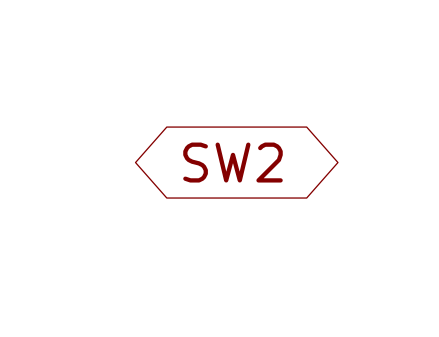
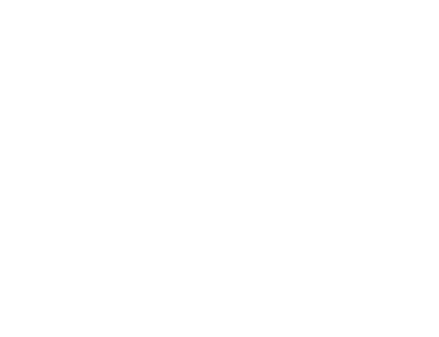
global label: SW2 (232, 162) -> none

